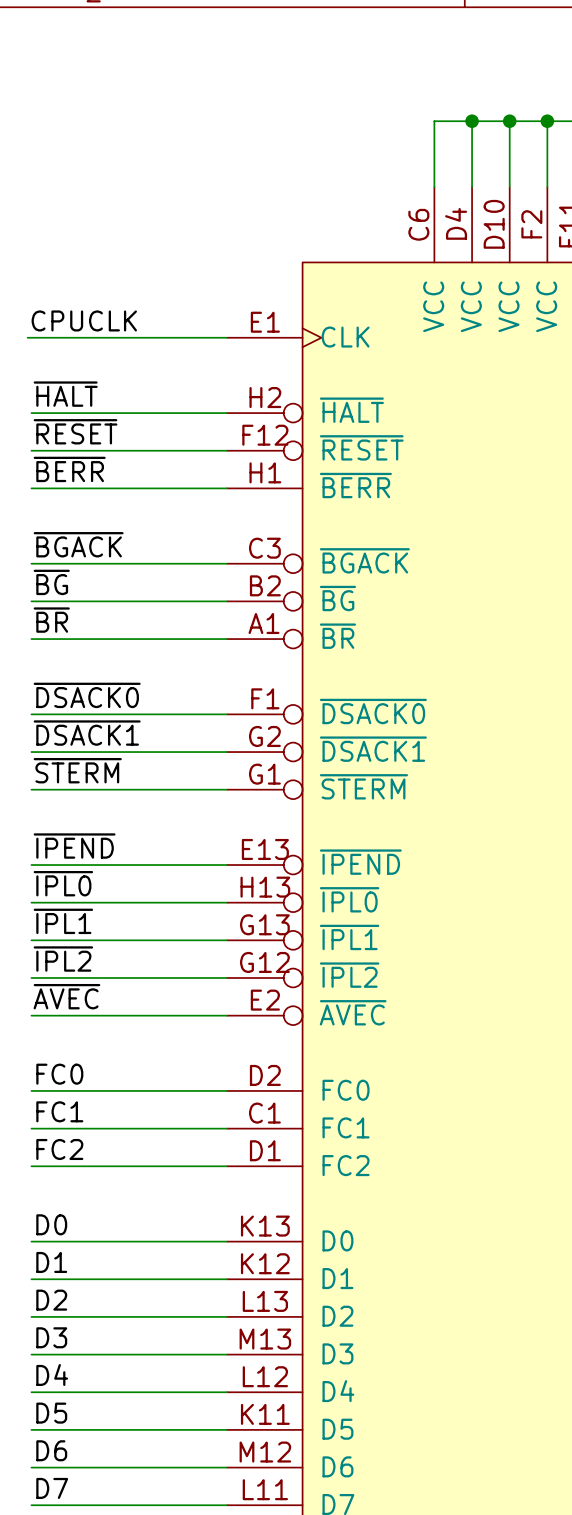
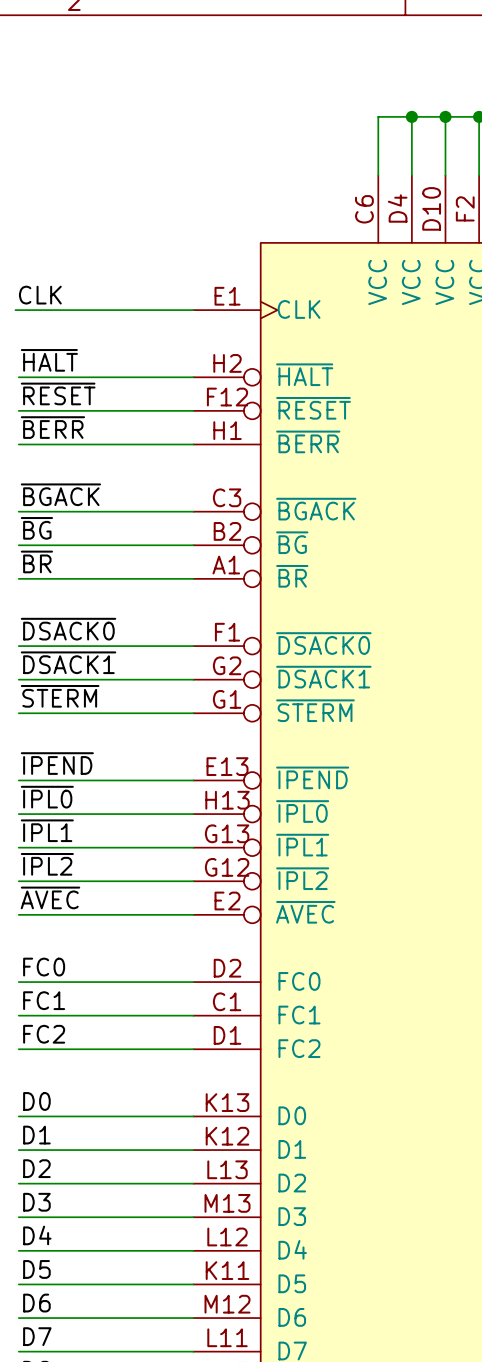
label: CPUCLK (84, 320) -> CLK (40, 295)

